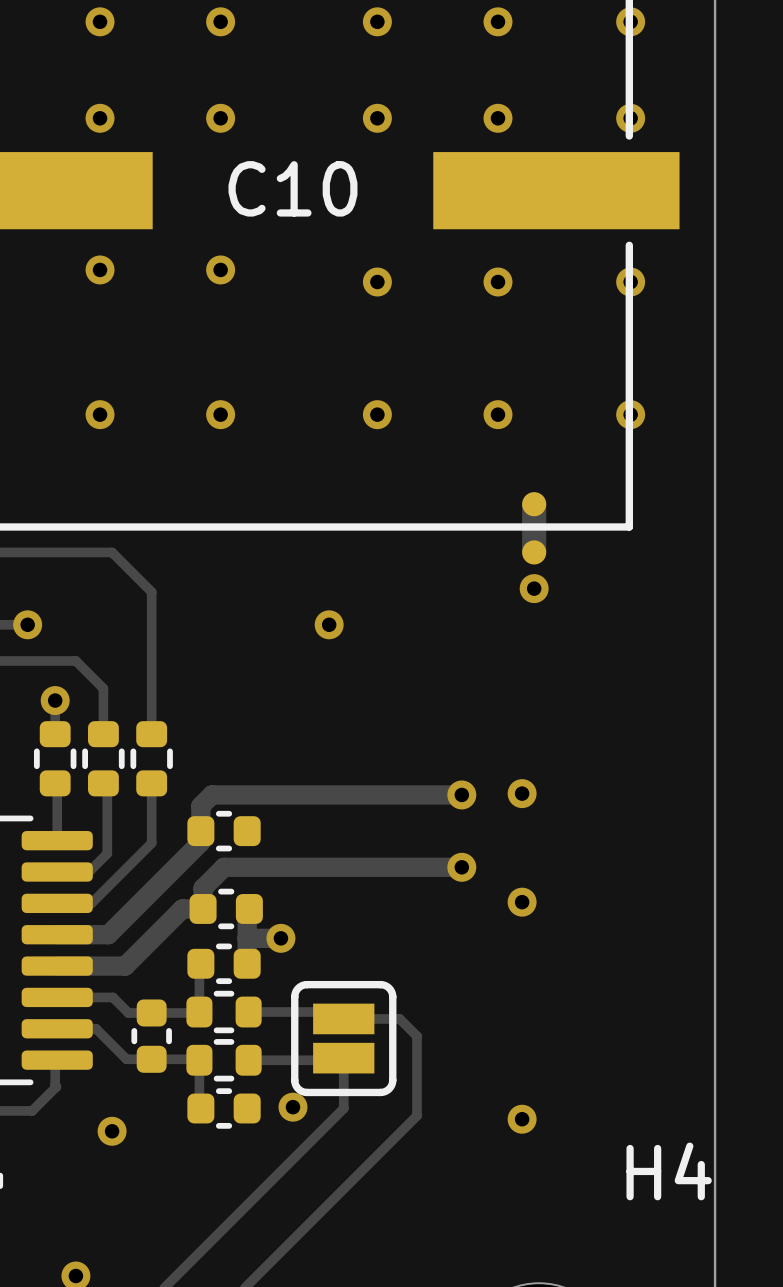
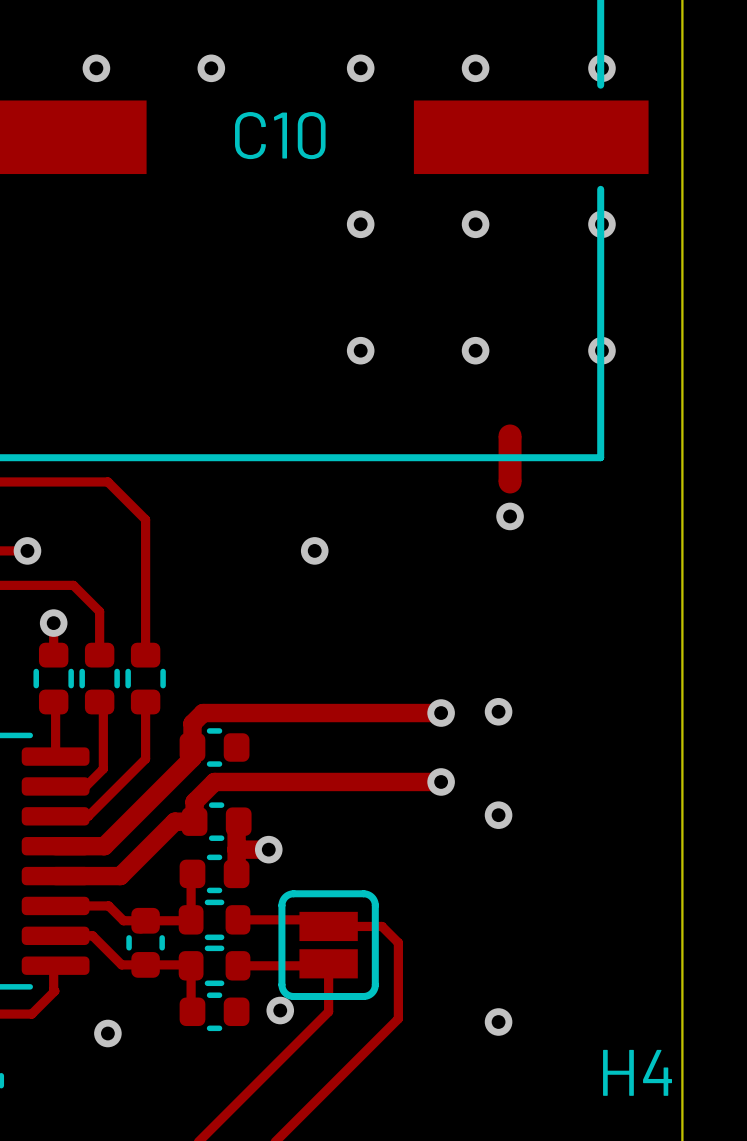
via: (100, 269) -> none
via: (220, 269) -> none
via: (100, 414) -> none
via: (220, 414) -> none

